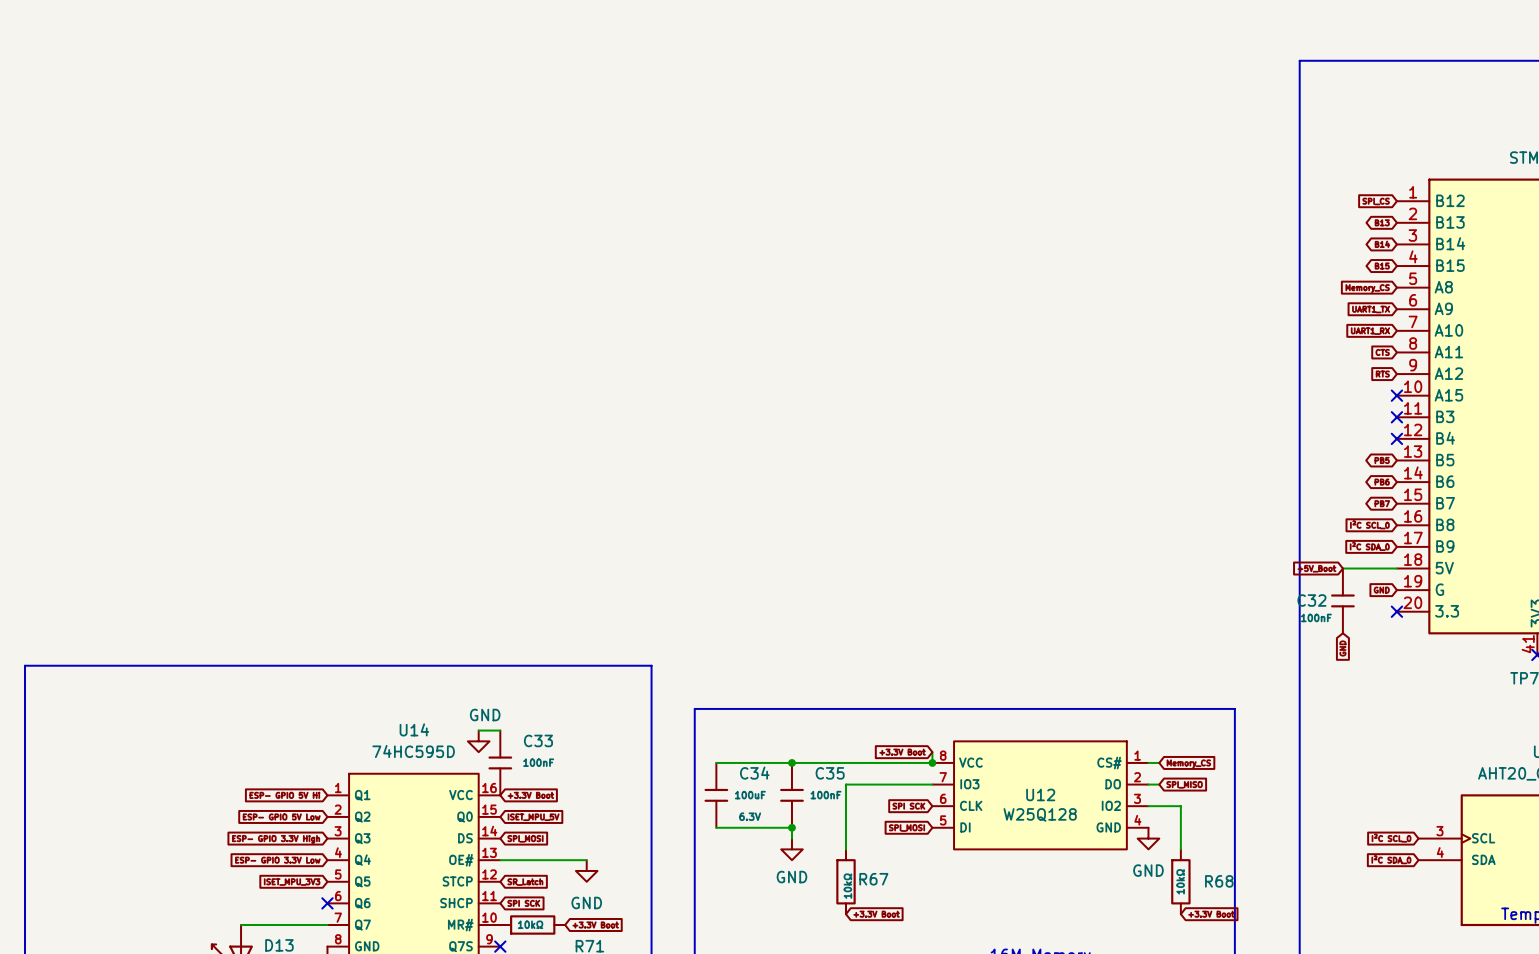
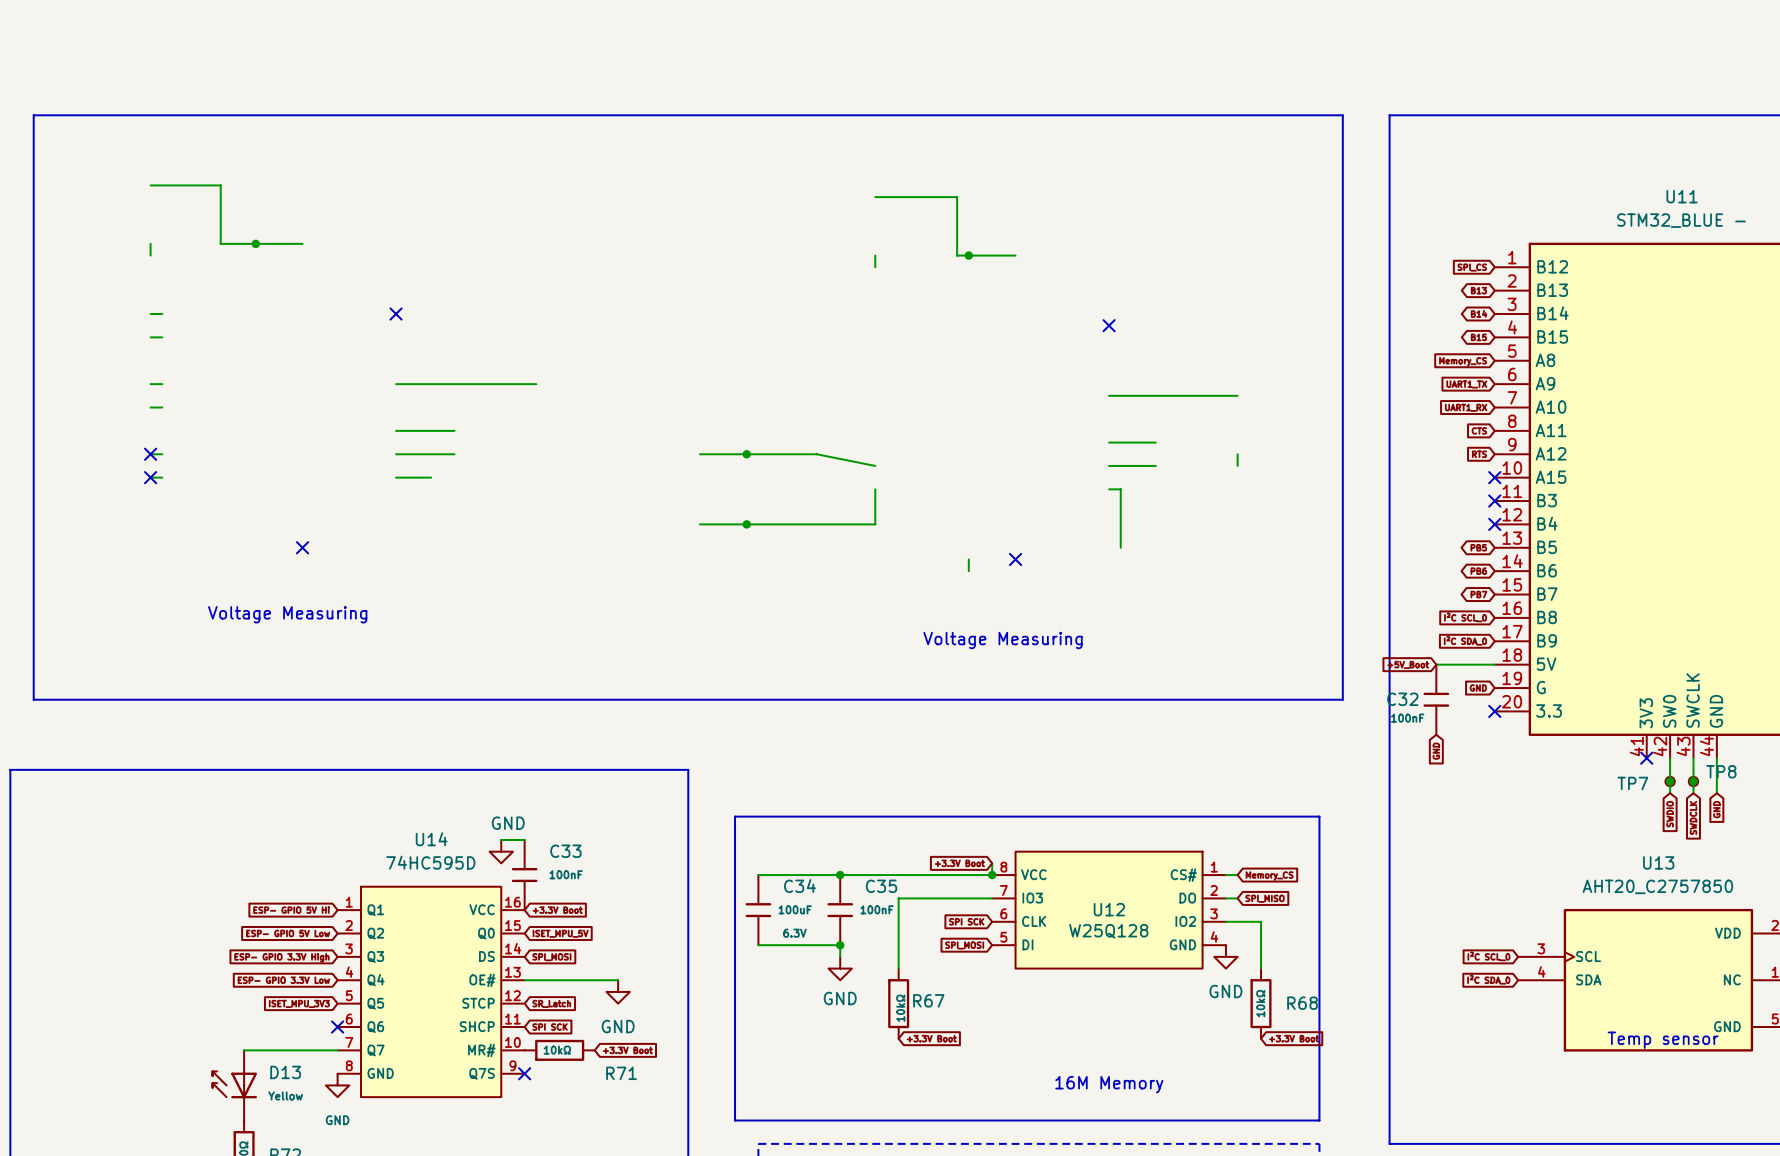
line: none -> (33, 115) (1342, 115) (1342, 699) (33, 699) (33, 115)
wire: none -> (150, 185) (220, 185) (220, 243) (302, 243)
wire: none -> (875, 197) (957, 197) (957, 255) (1015, 255)
wire: none -> (150, 243) (150, 255)
junction: none -> (255, 243)
wire: none -> (875, 255) (875, 267)
junction: none -> (968, 255)
wire: none -> (150, 314) (162, 314)
no-connect mark: none -> (396, 314)
no-connect mark: none -> (1109, 325)
wire: none -> (150, 337) (162, 337)
wire: none -> (150, 384) (162, 384)
wire: none -> (396, 384) (536, 384)
wire: none -> (1109, 395) (1237, 395)
wire: none -> (150, 407) (162, 407)
wire: none -> (396, 430) (454, 430)
wire: none -> (1109, 442) (1155, 442)
wire: none -> (150, 454) (162, 454)
no-connect mark: none -> (150, 454)
wire: none -> (396, 454) (454, 454)
wire: none -> (699, 454) (816, 454) (875, 465)
junction: none -> (746, 454)
wire: none -> (1237, 454) (1237, 465)
wire: none -> (1109, 465) (1155, 465)
wire: none -> (150, 477) (162, 477)
no-connect mark: none -> (150, 477)
wire: none -> (396, 477) (431, 477)
wire: none -> (875, 489) (875, 524) (699, 524)
wire: none -> (1109, 489) (1120, 489) (1120, 547)
junction: none -> (746, 524)
no-connect mark: none -> (302, 547)
wire: none -> (968, 559) (968, 571)
no-connect mark: none -> (1015, 559)
text: none -> Voltage Measuring (287, 614)
text: none -> Voltage Measuring (1003, 640)

